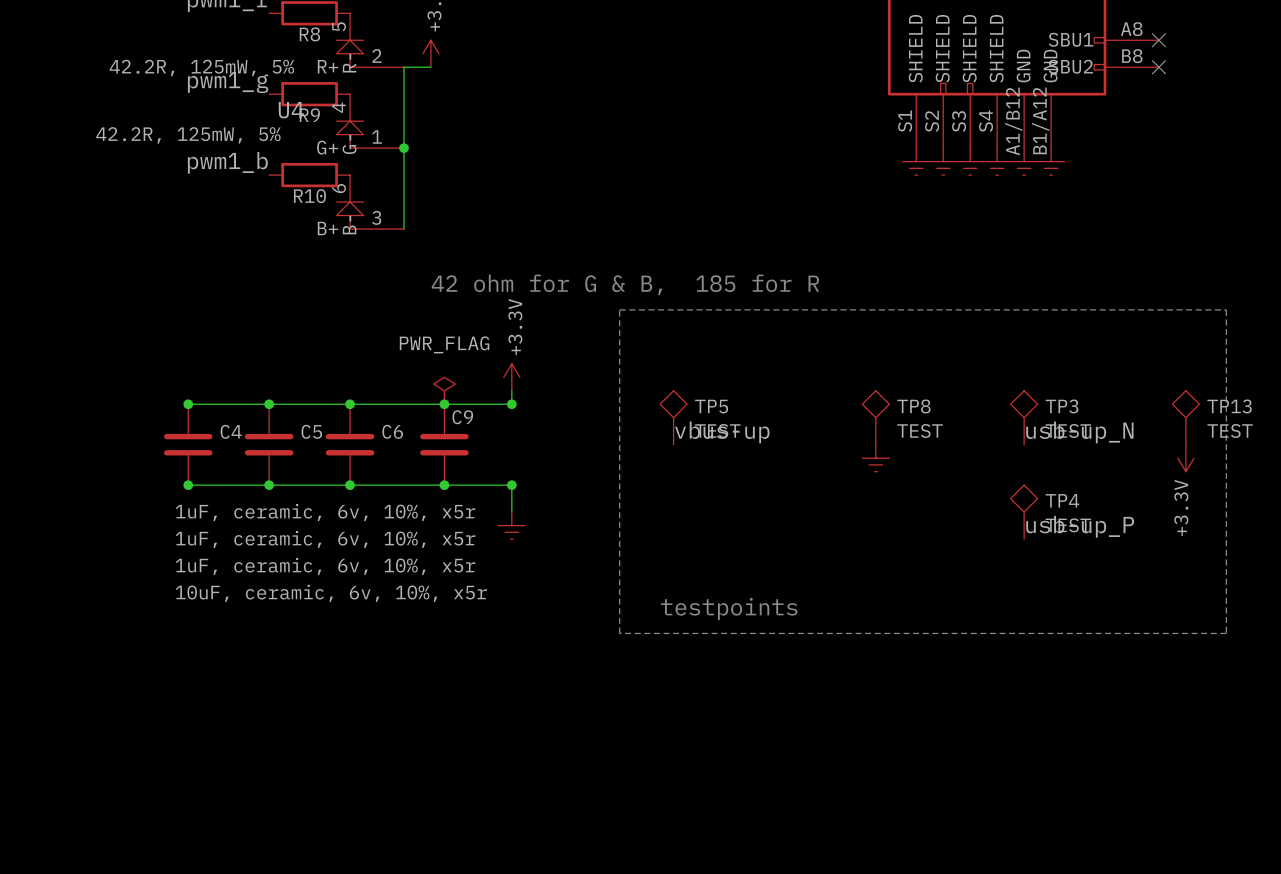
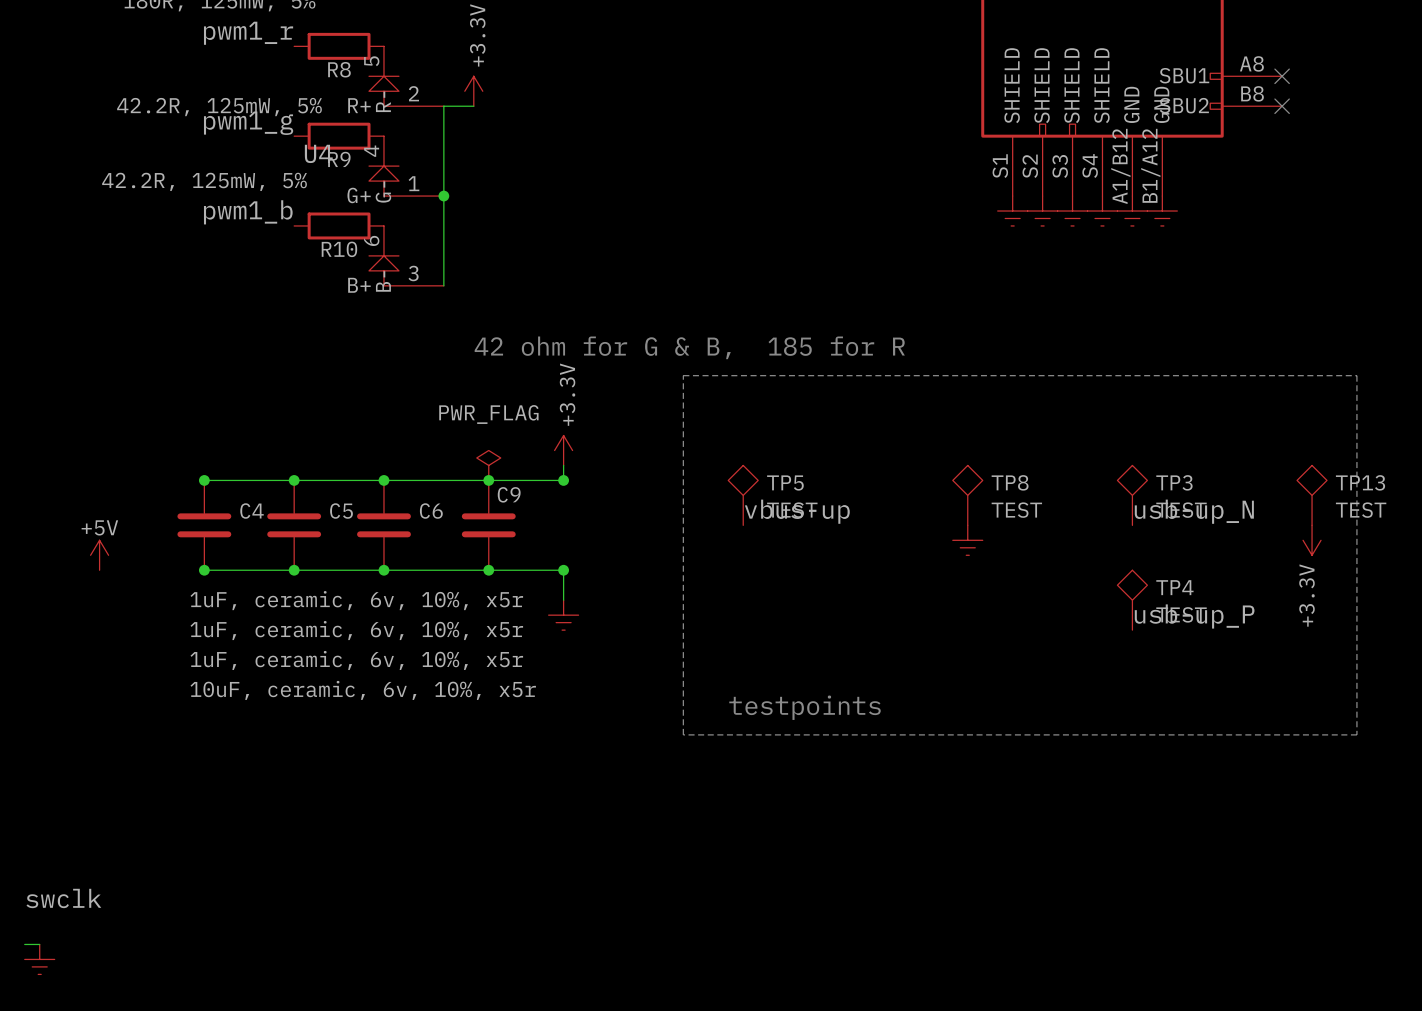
power symbol: none -> +5V (99, 555)
label: none -> swclk (63, 898)
wire: none -> (24, 944) (39, 944)
power symbol: none -> (39, 959)

